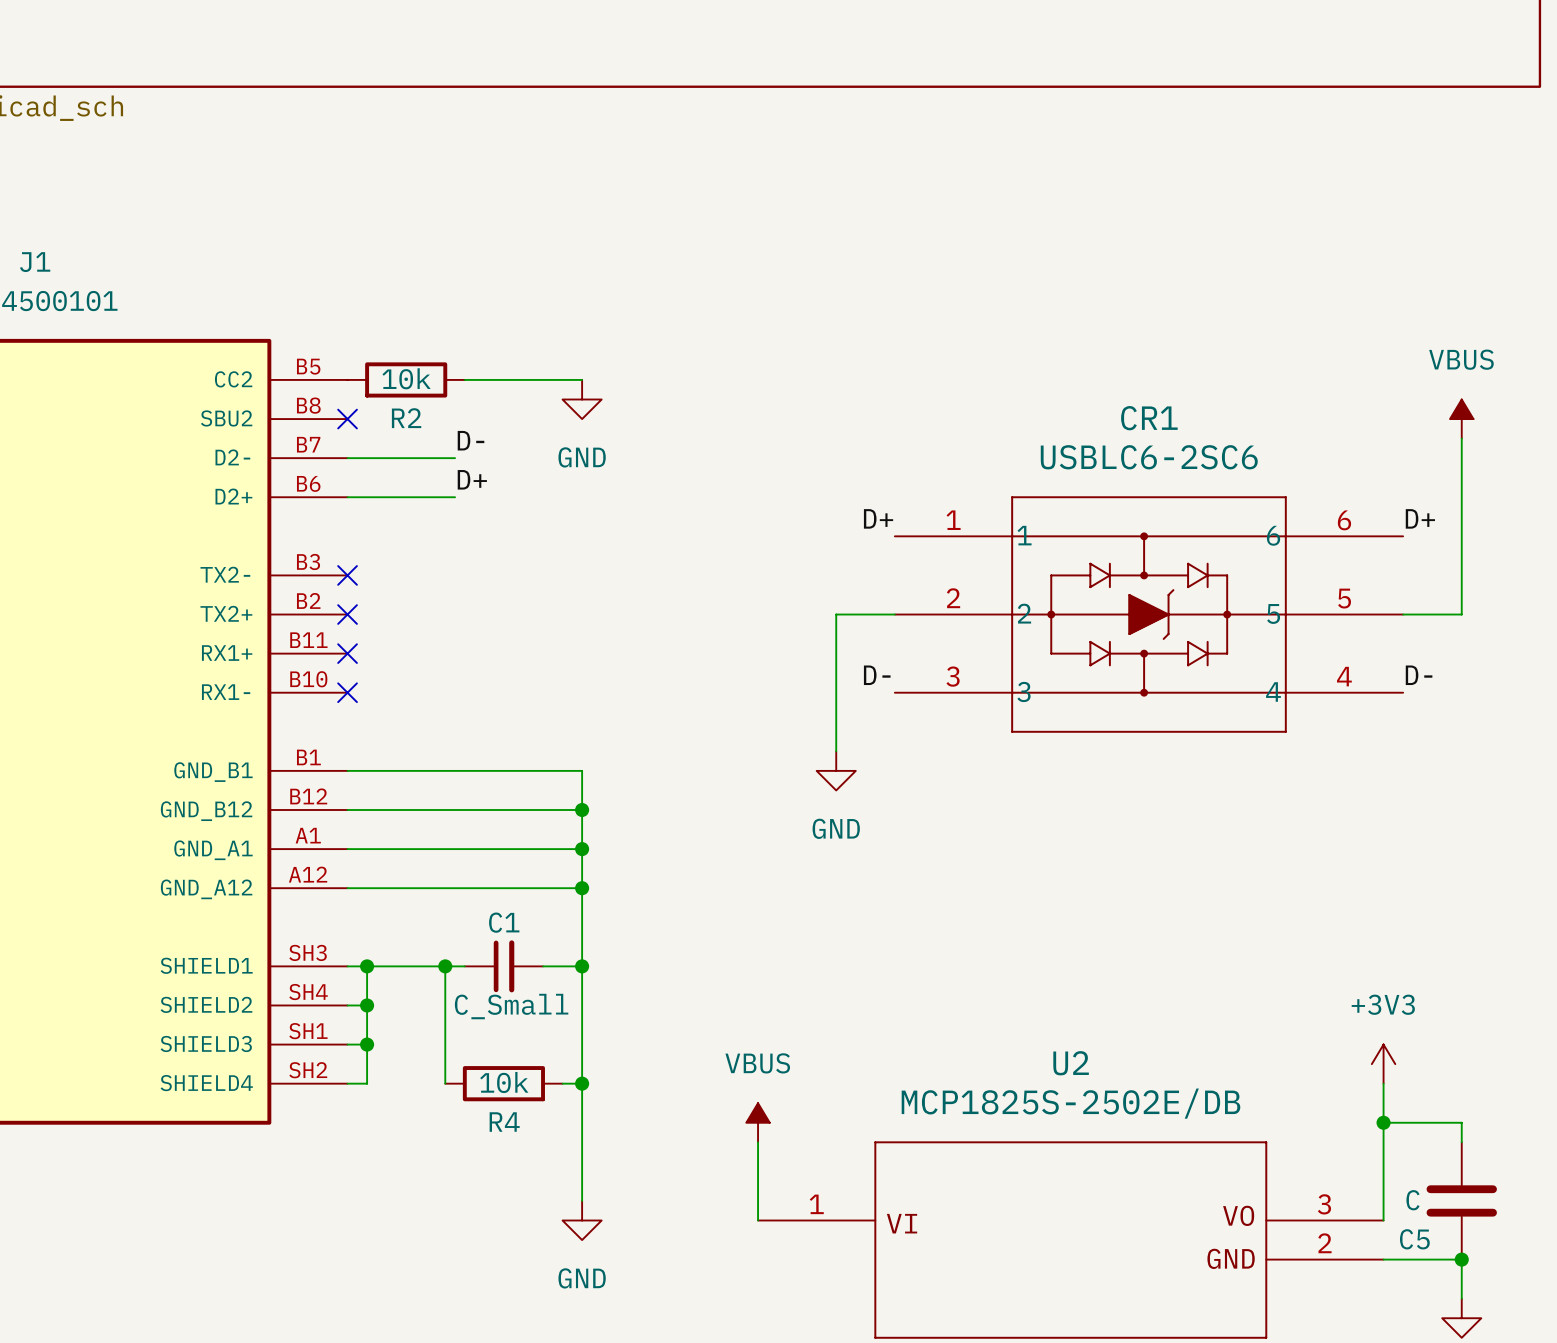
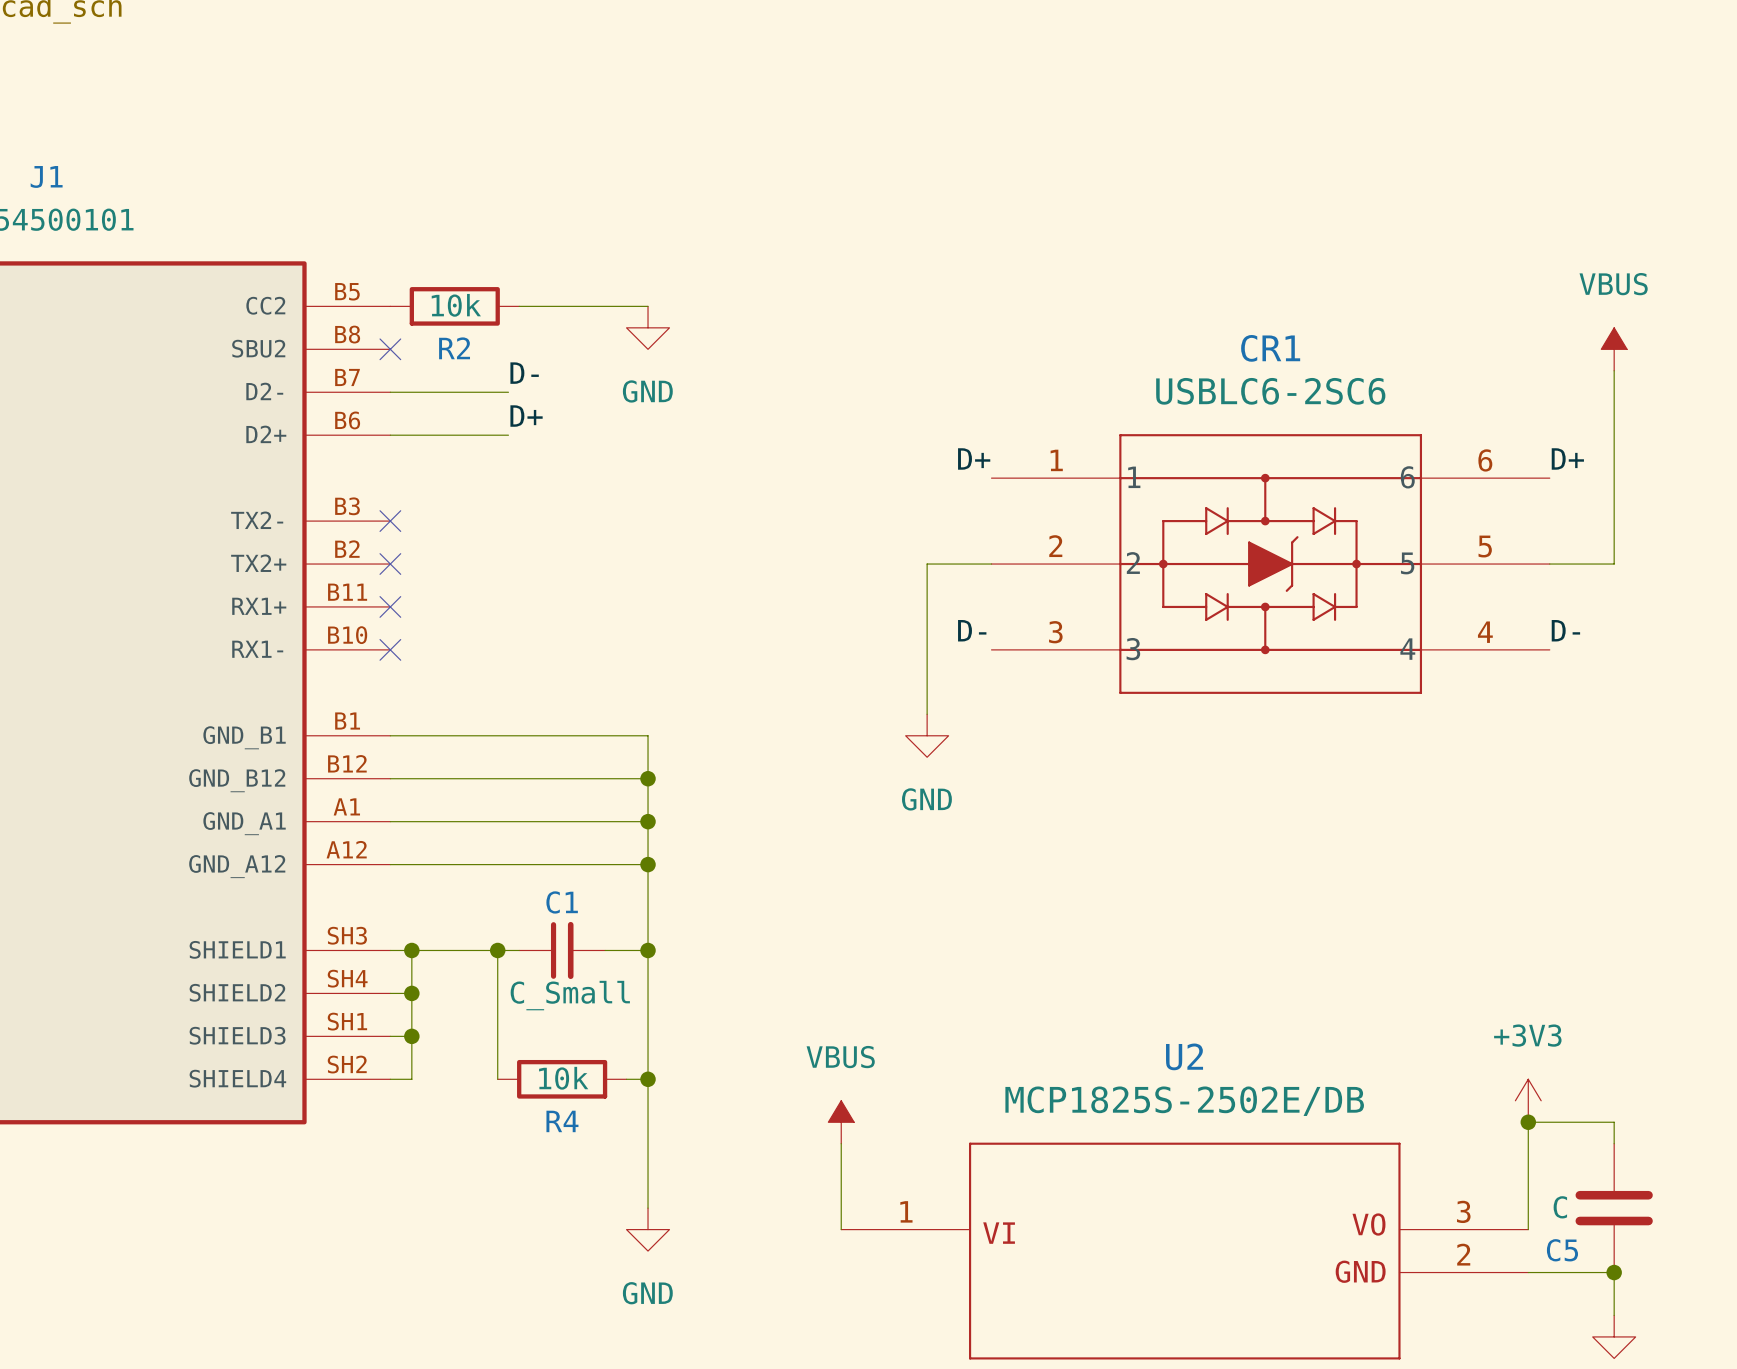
power symbol position: +3V3 (1383, 1064) -> +3V3 (1528, 1100)

